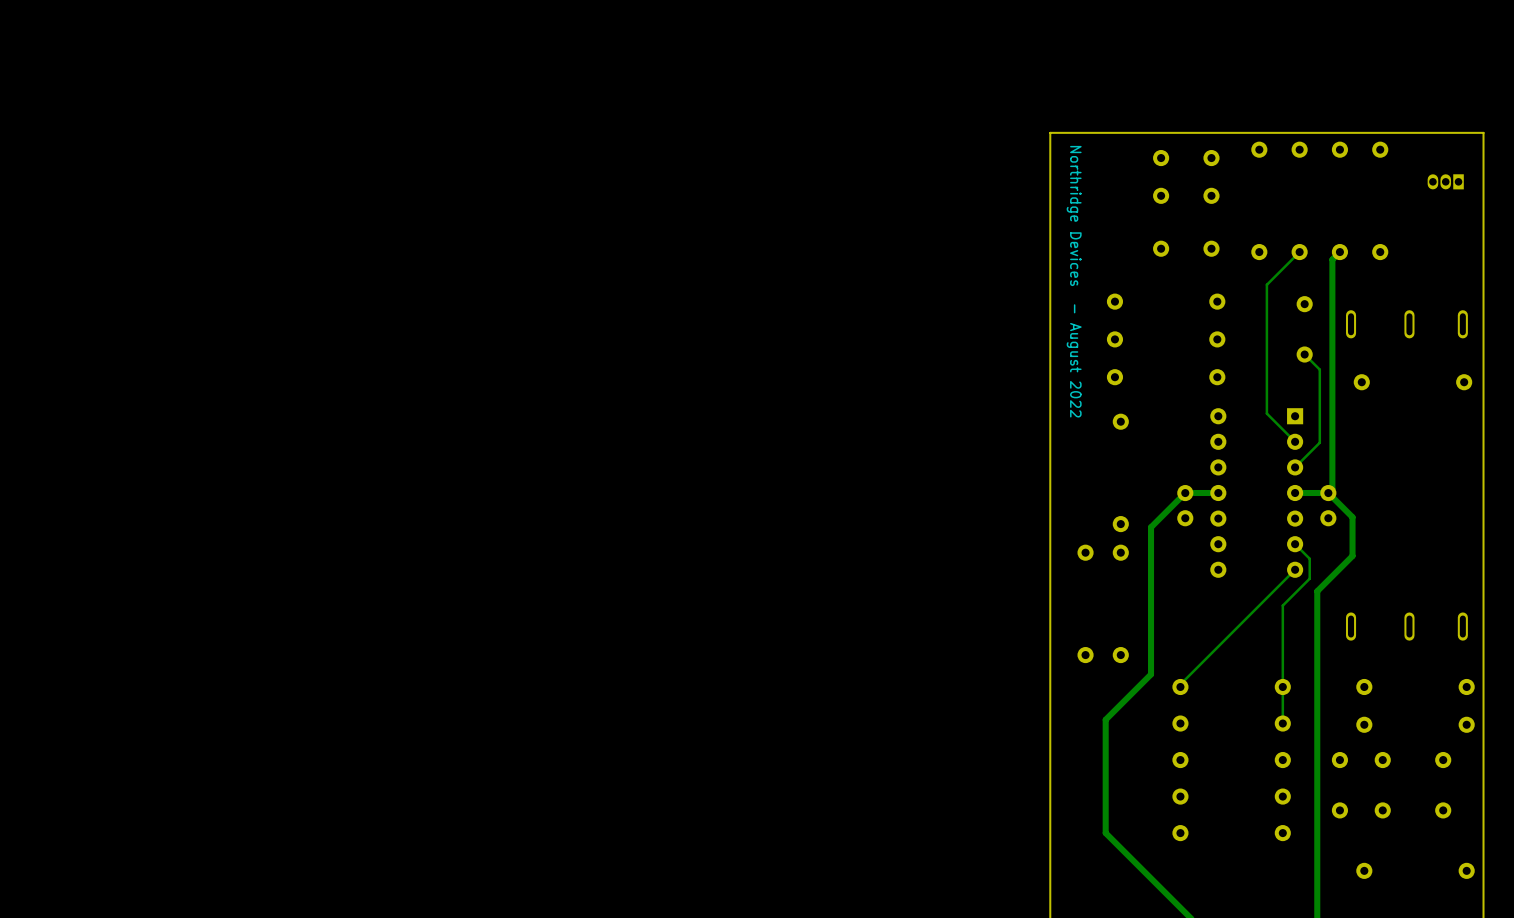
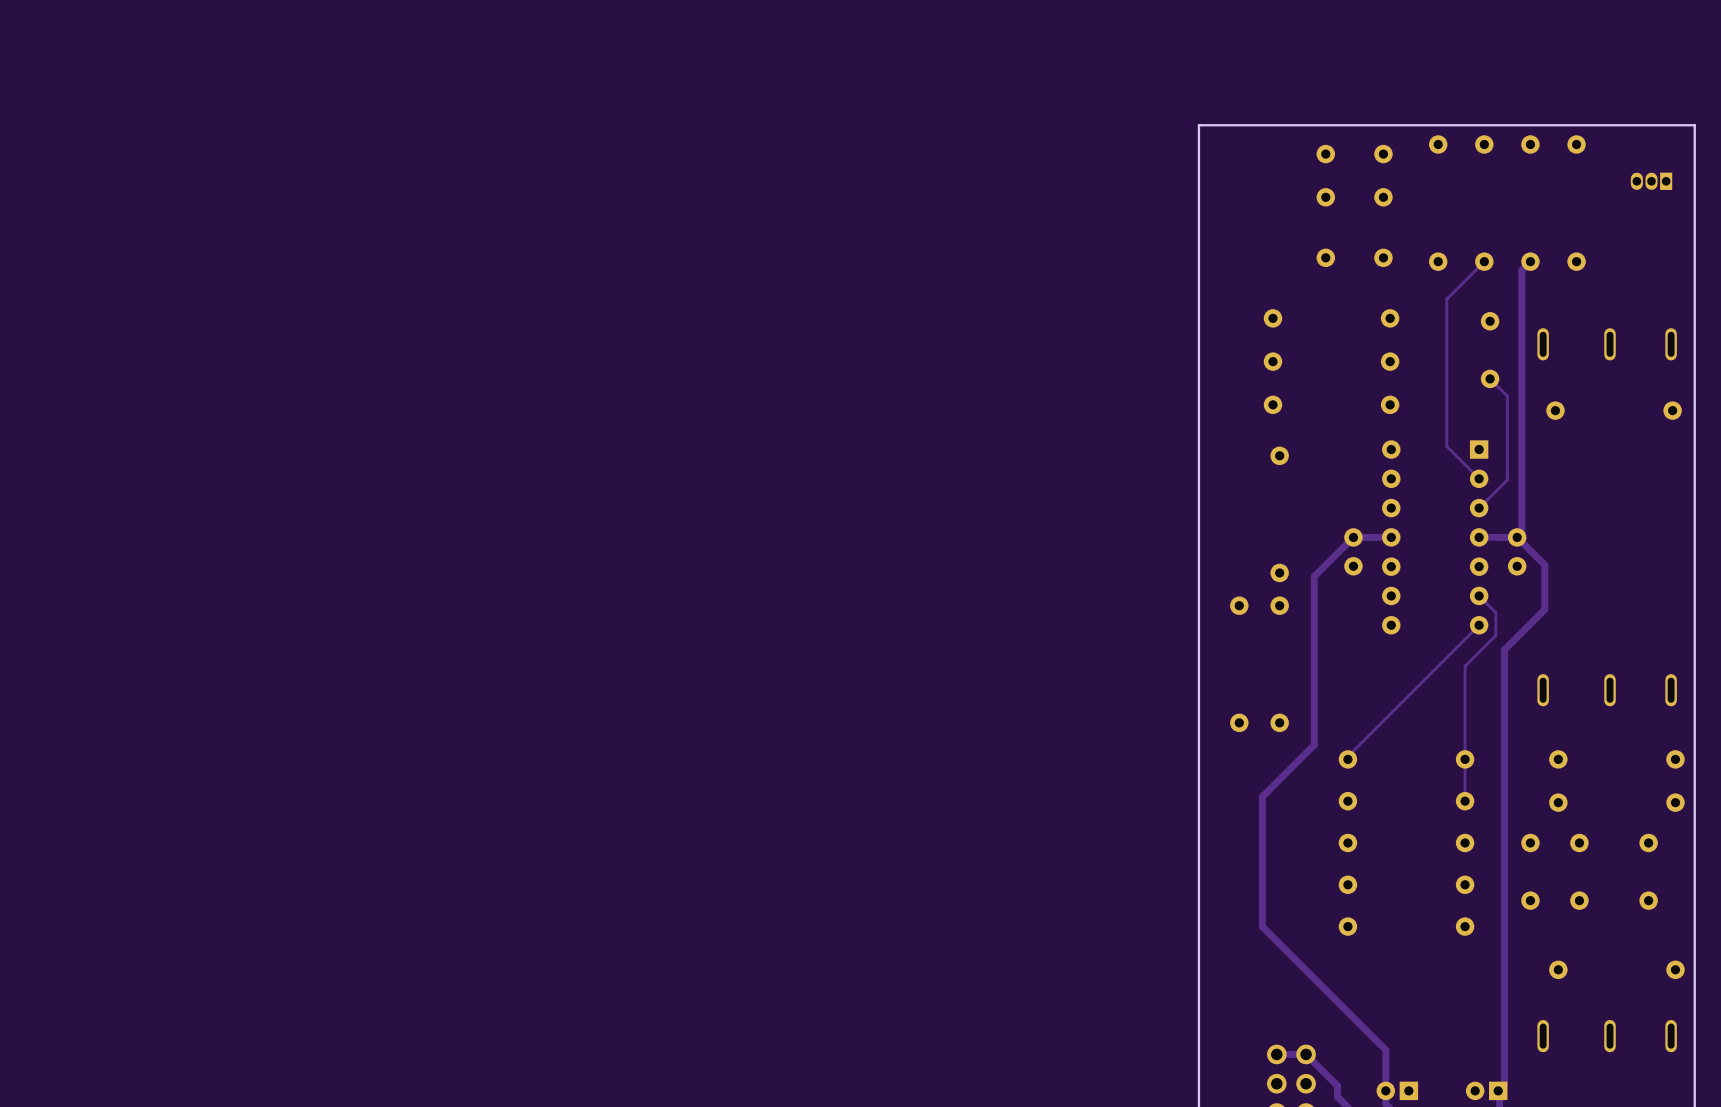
text: Northridge Devices - August 2022 (1074, 281) -> none

